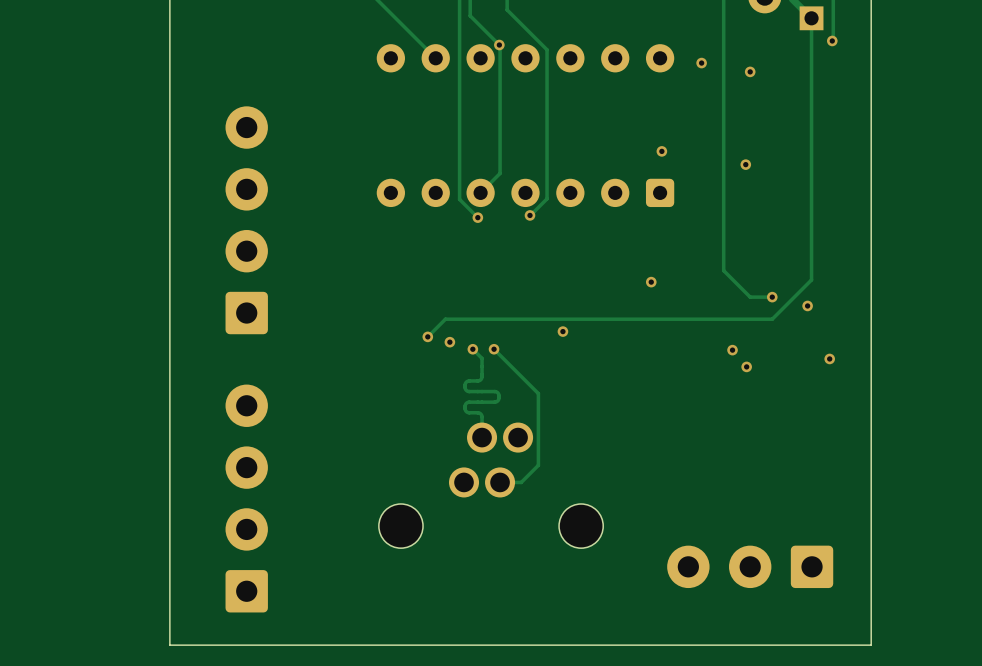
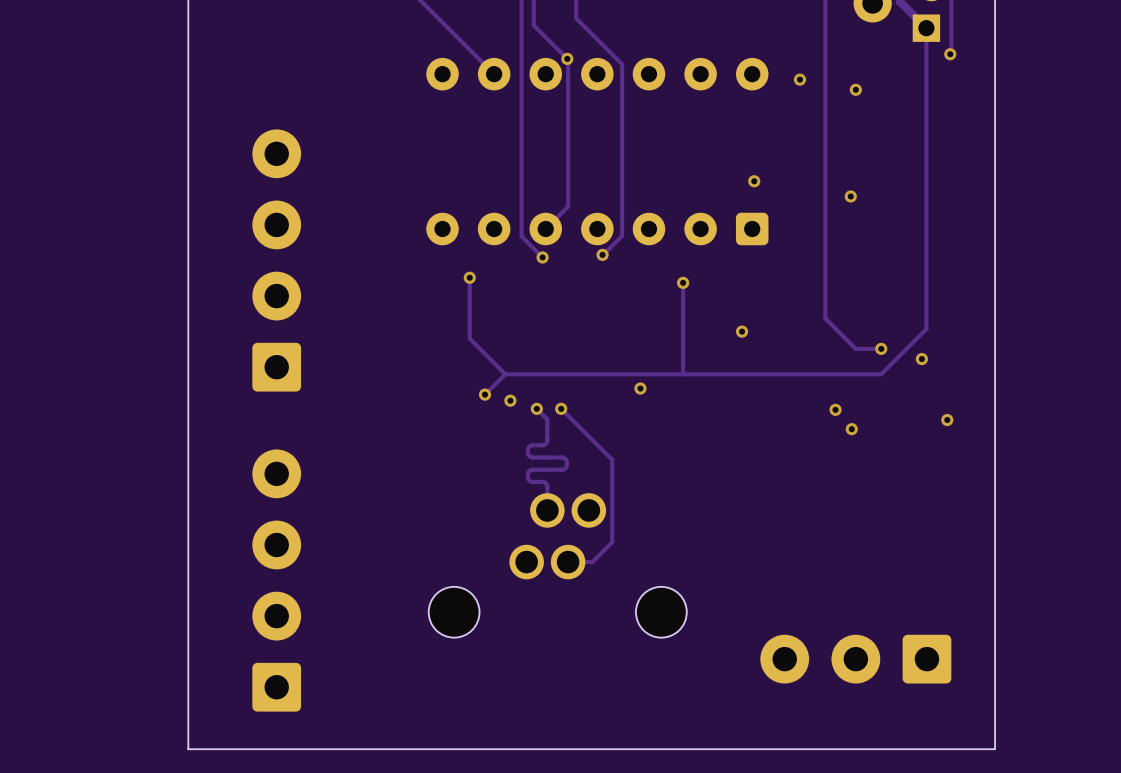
track: none -> (469, 277) (469, 338) (505, 374)
via: none -> (469, 277)
track: none -> (683, 282) (683, 374)
via: none -> (683, 282)

